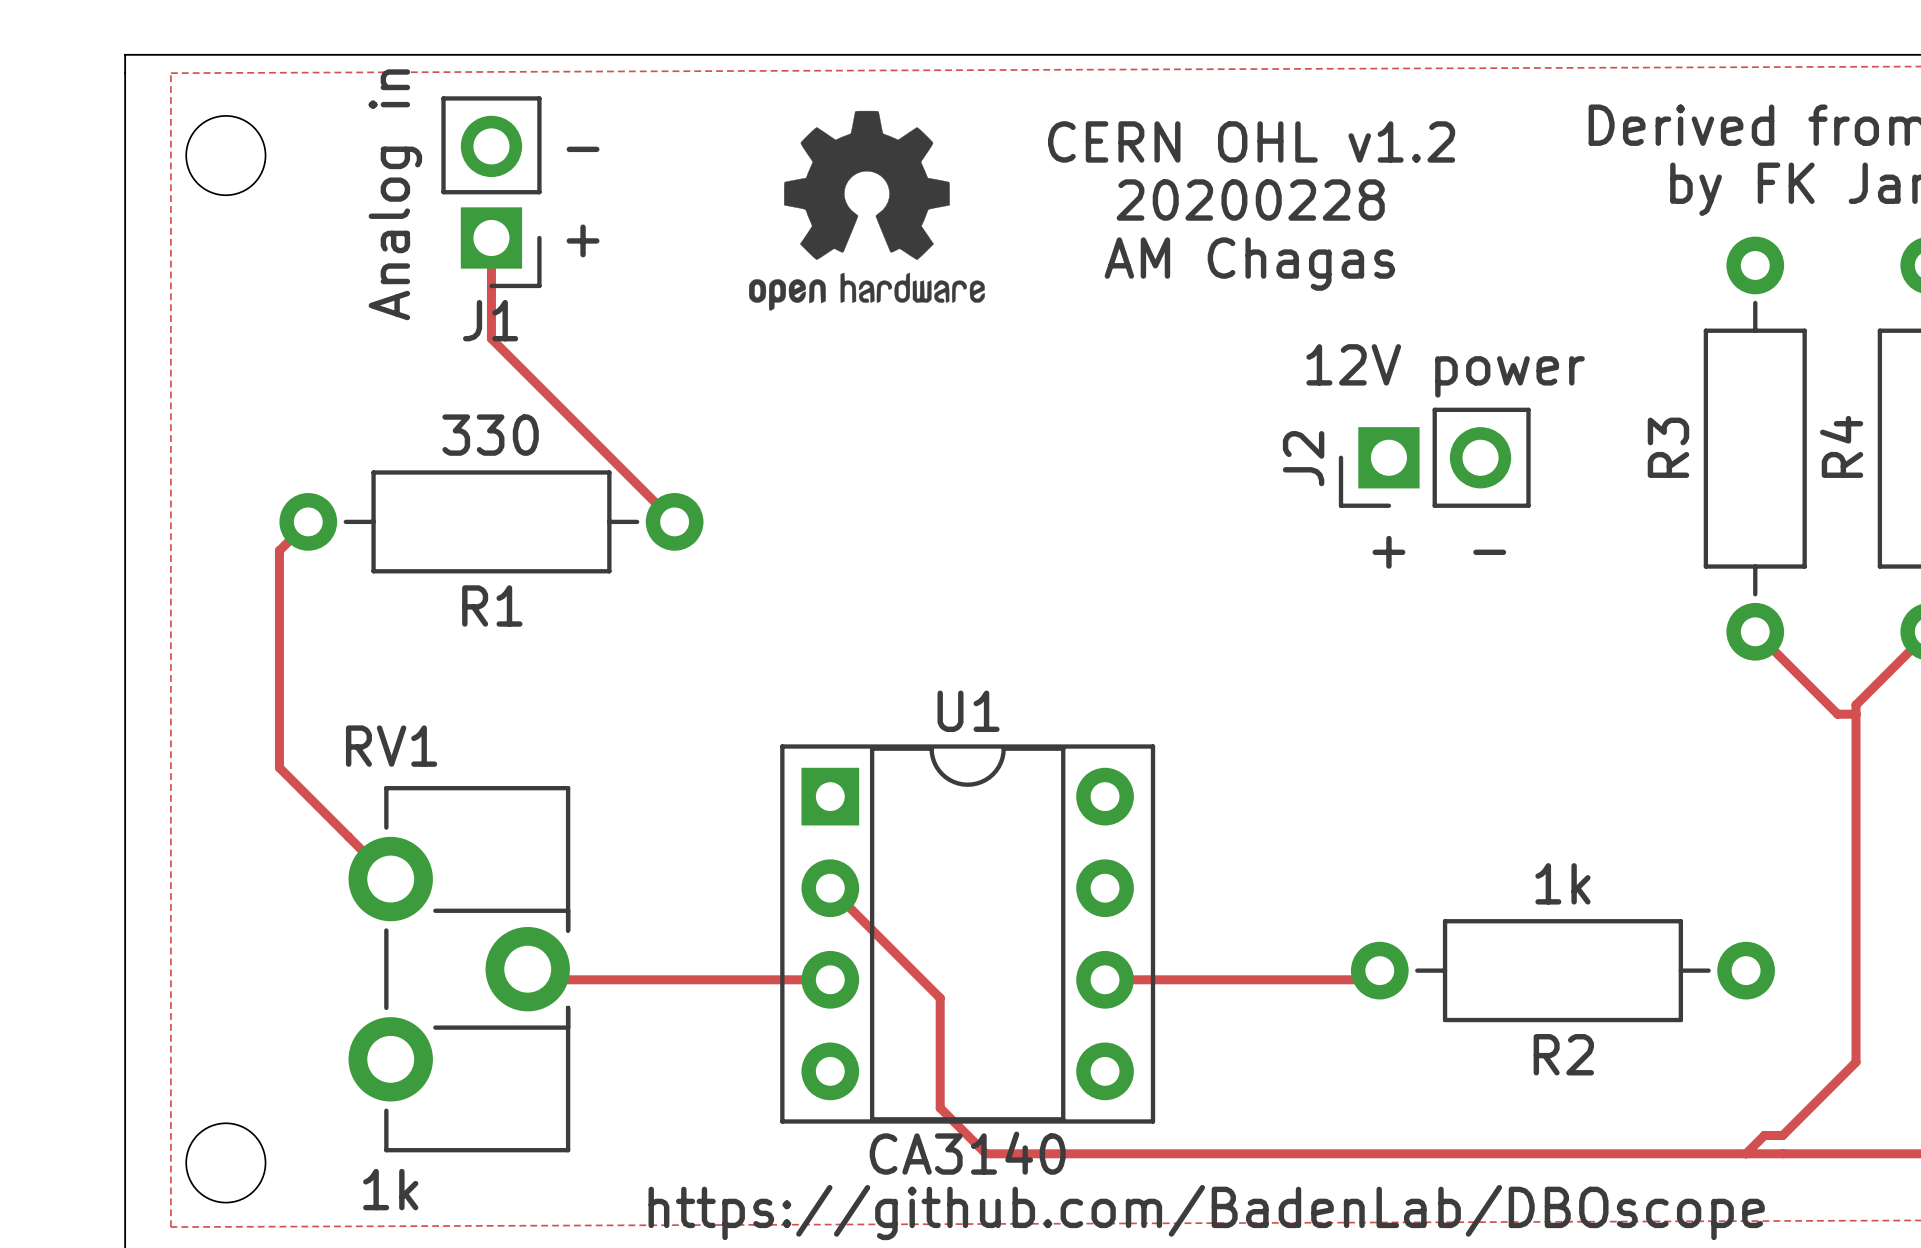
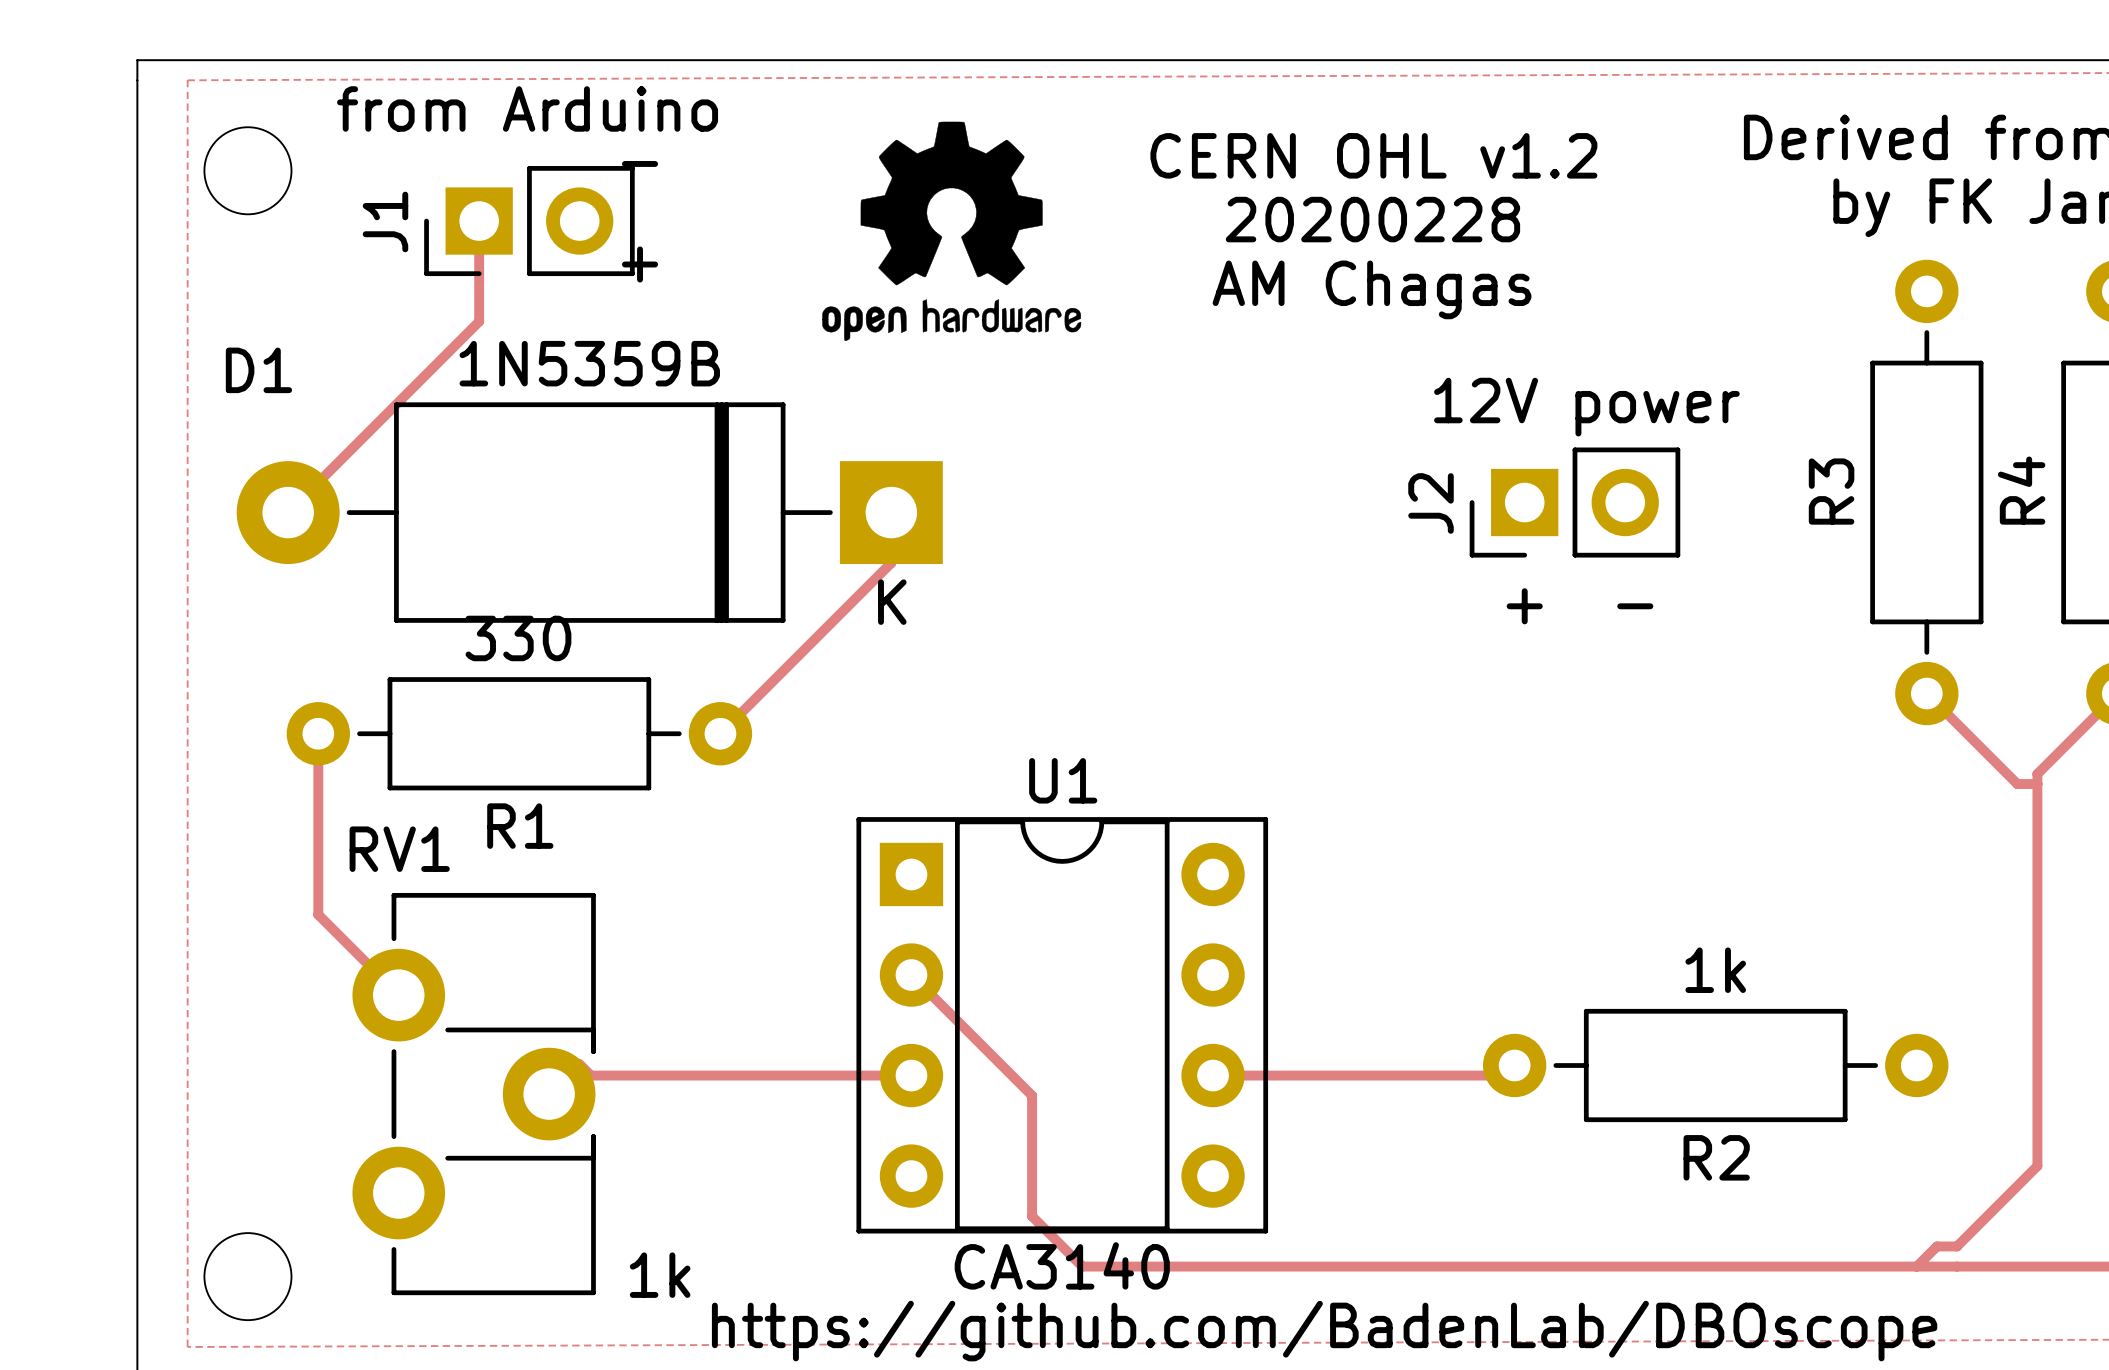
J1 rotation: 0° (491, 192) -> 90° clockwise (529, 221)
J1 value: Analog in (395, 194) -> from Arduino (527, 108)
track: none -> (479, 221) (479, 321) (288, 512)
track: (491, 237) (491, 338) (674, 521) -> none
D1: none -> 1N5359B (589, 512)
track: none -> (891, 512) (891, 562) (720, 733)
track: (308, 521) (279, 550) (279, 767) (390, 879) -> none
R1 position: (491, 521) -> (519, 733)
track: none -> (318, 733) (318, 914) (398, 995)
RV1 position: (459, 969) -> (474, 1094)
RV1 value position: 1k (390, 1189) -> 1k (660, 1275)

